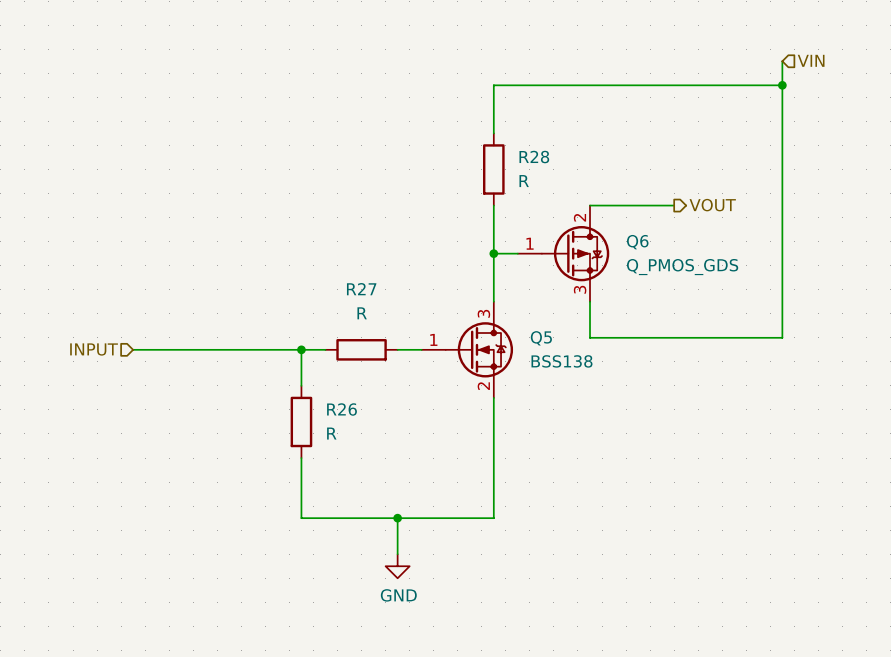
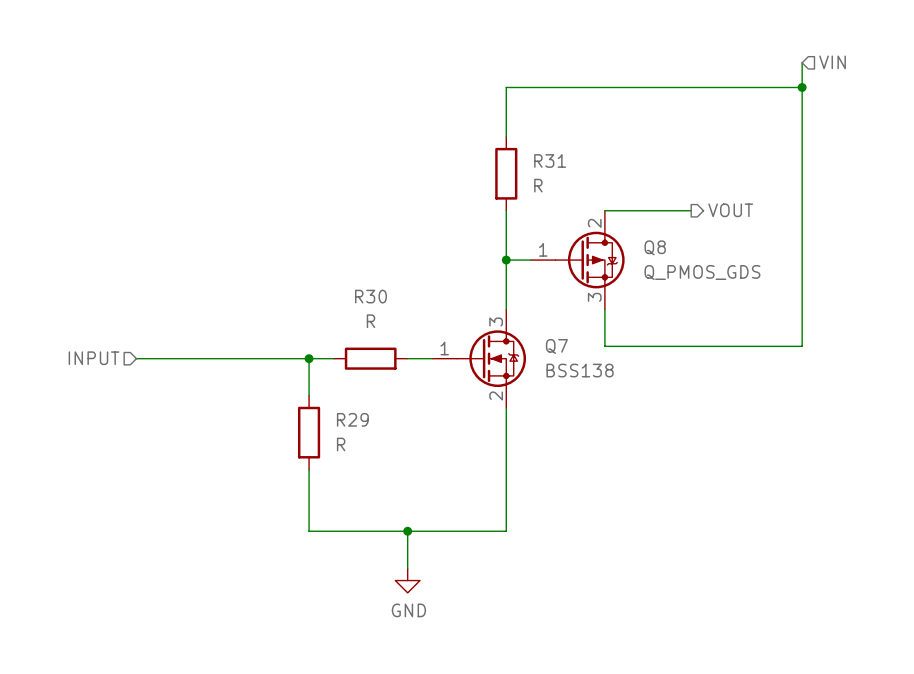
R28 name: R28 (534, 157) -> R31 (550, 160)
Q6 name: Q6 (637, 242) -> Q8 (655, 247)
R27 name: R27 (361, 289) -> R30 (370, 296)
Q5 name: Q5 (541, 338) -> Q7 (556, 346)
R26 name: R26 (342, 409) -> R29 (352, 419)

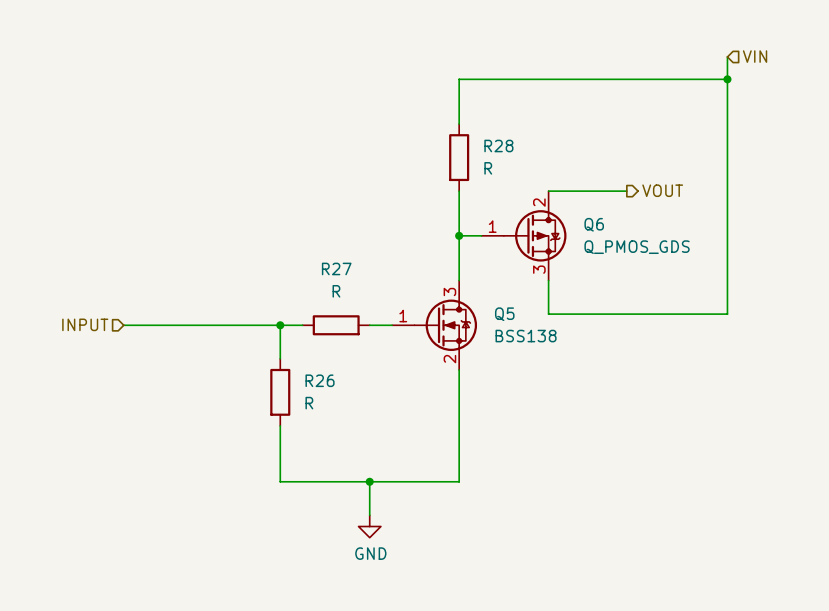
R31 name: R31 (550, 160) -> R28 (498, 145)
Q8 name: Q8 (655, 247) -> Q6 (594, 224)
R30 name: R30 (370, 296) -> R27 (336, 268)
Q7 name: Q7 (556, 346) -> Q5 (504, 314)
R29 name: R29 (352, 419) -> R26 (320, 380)

